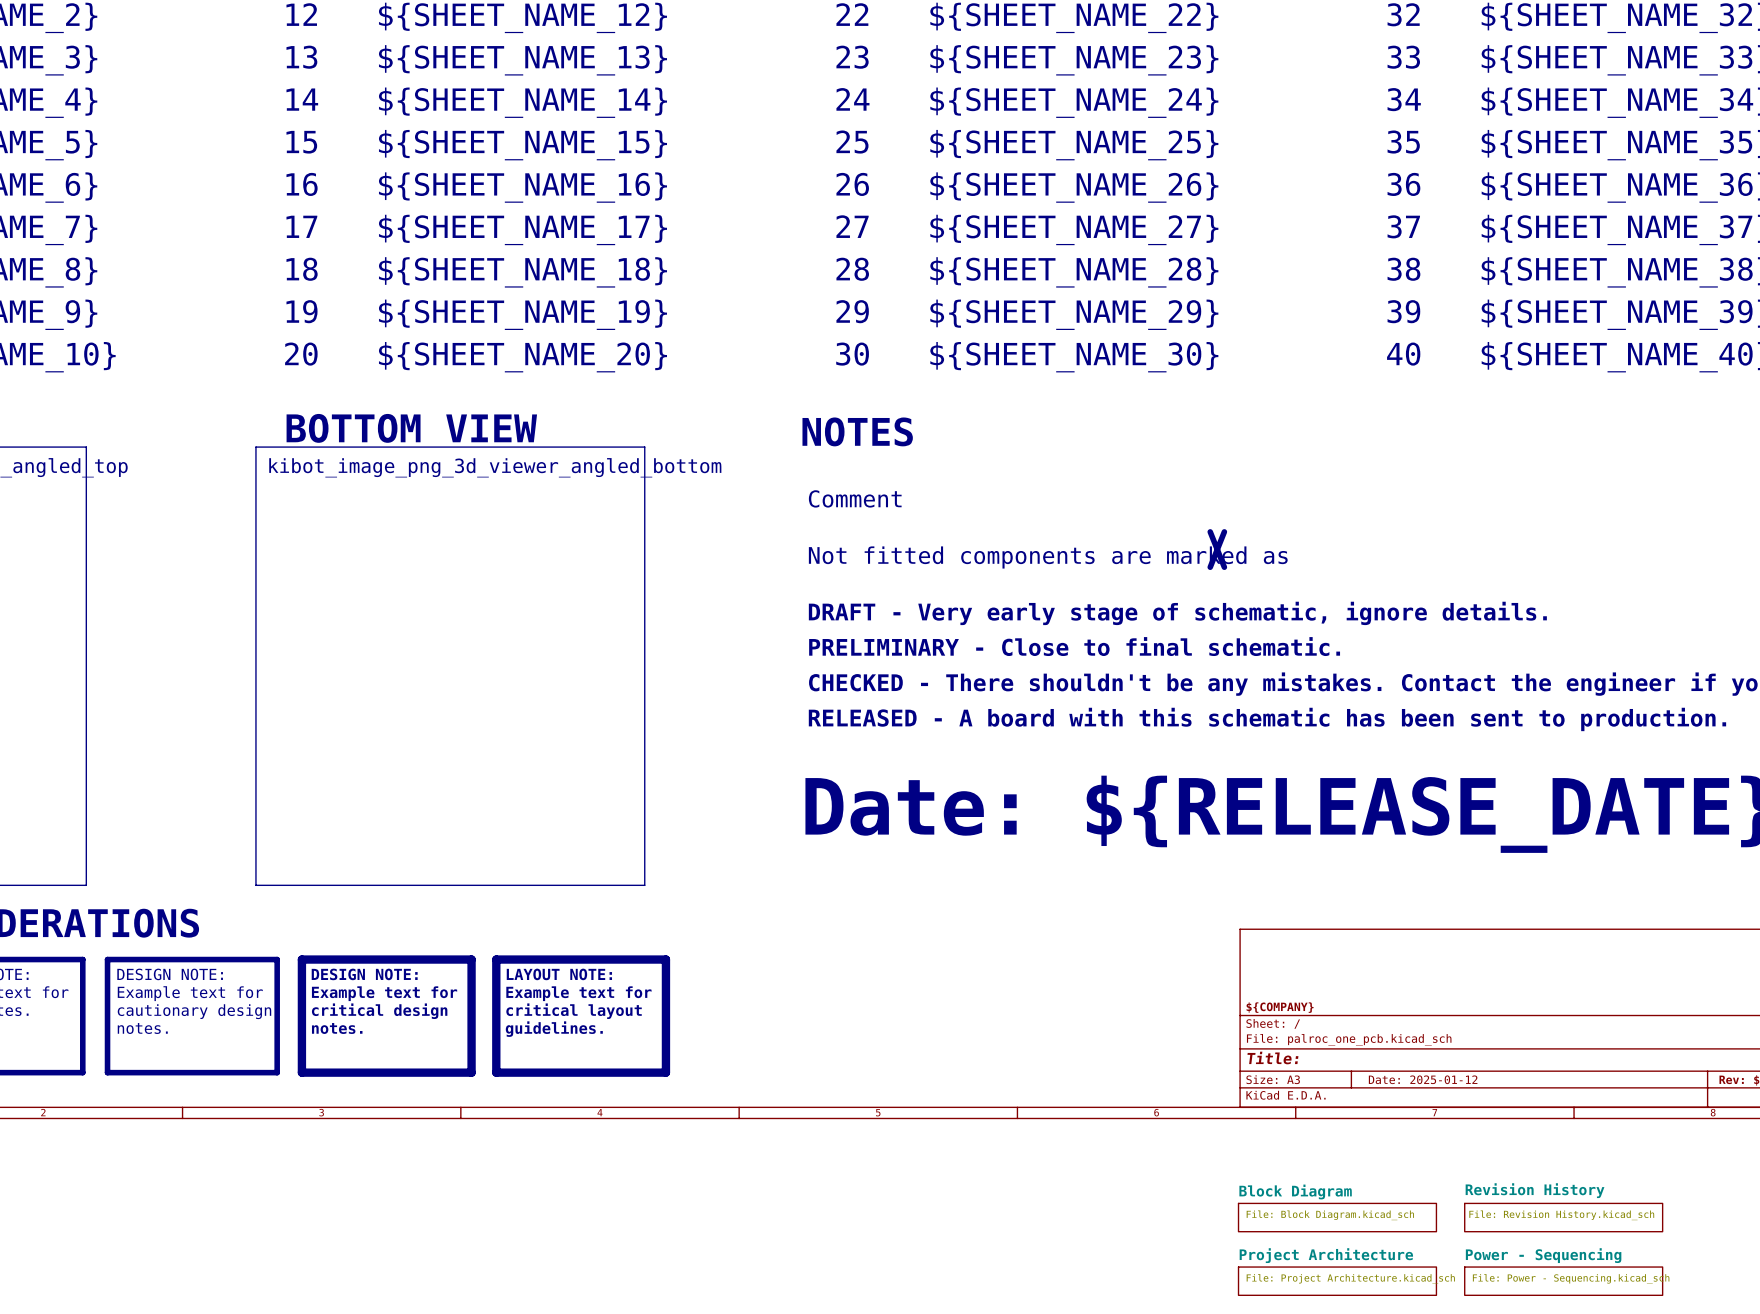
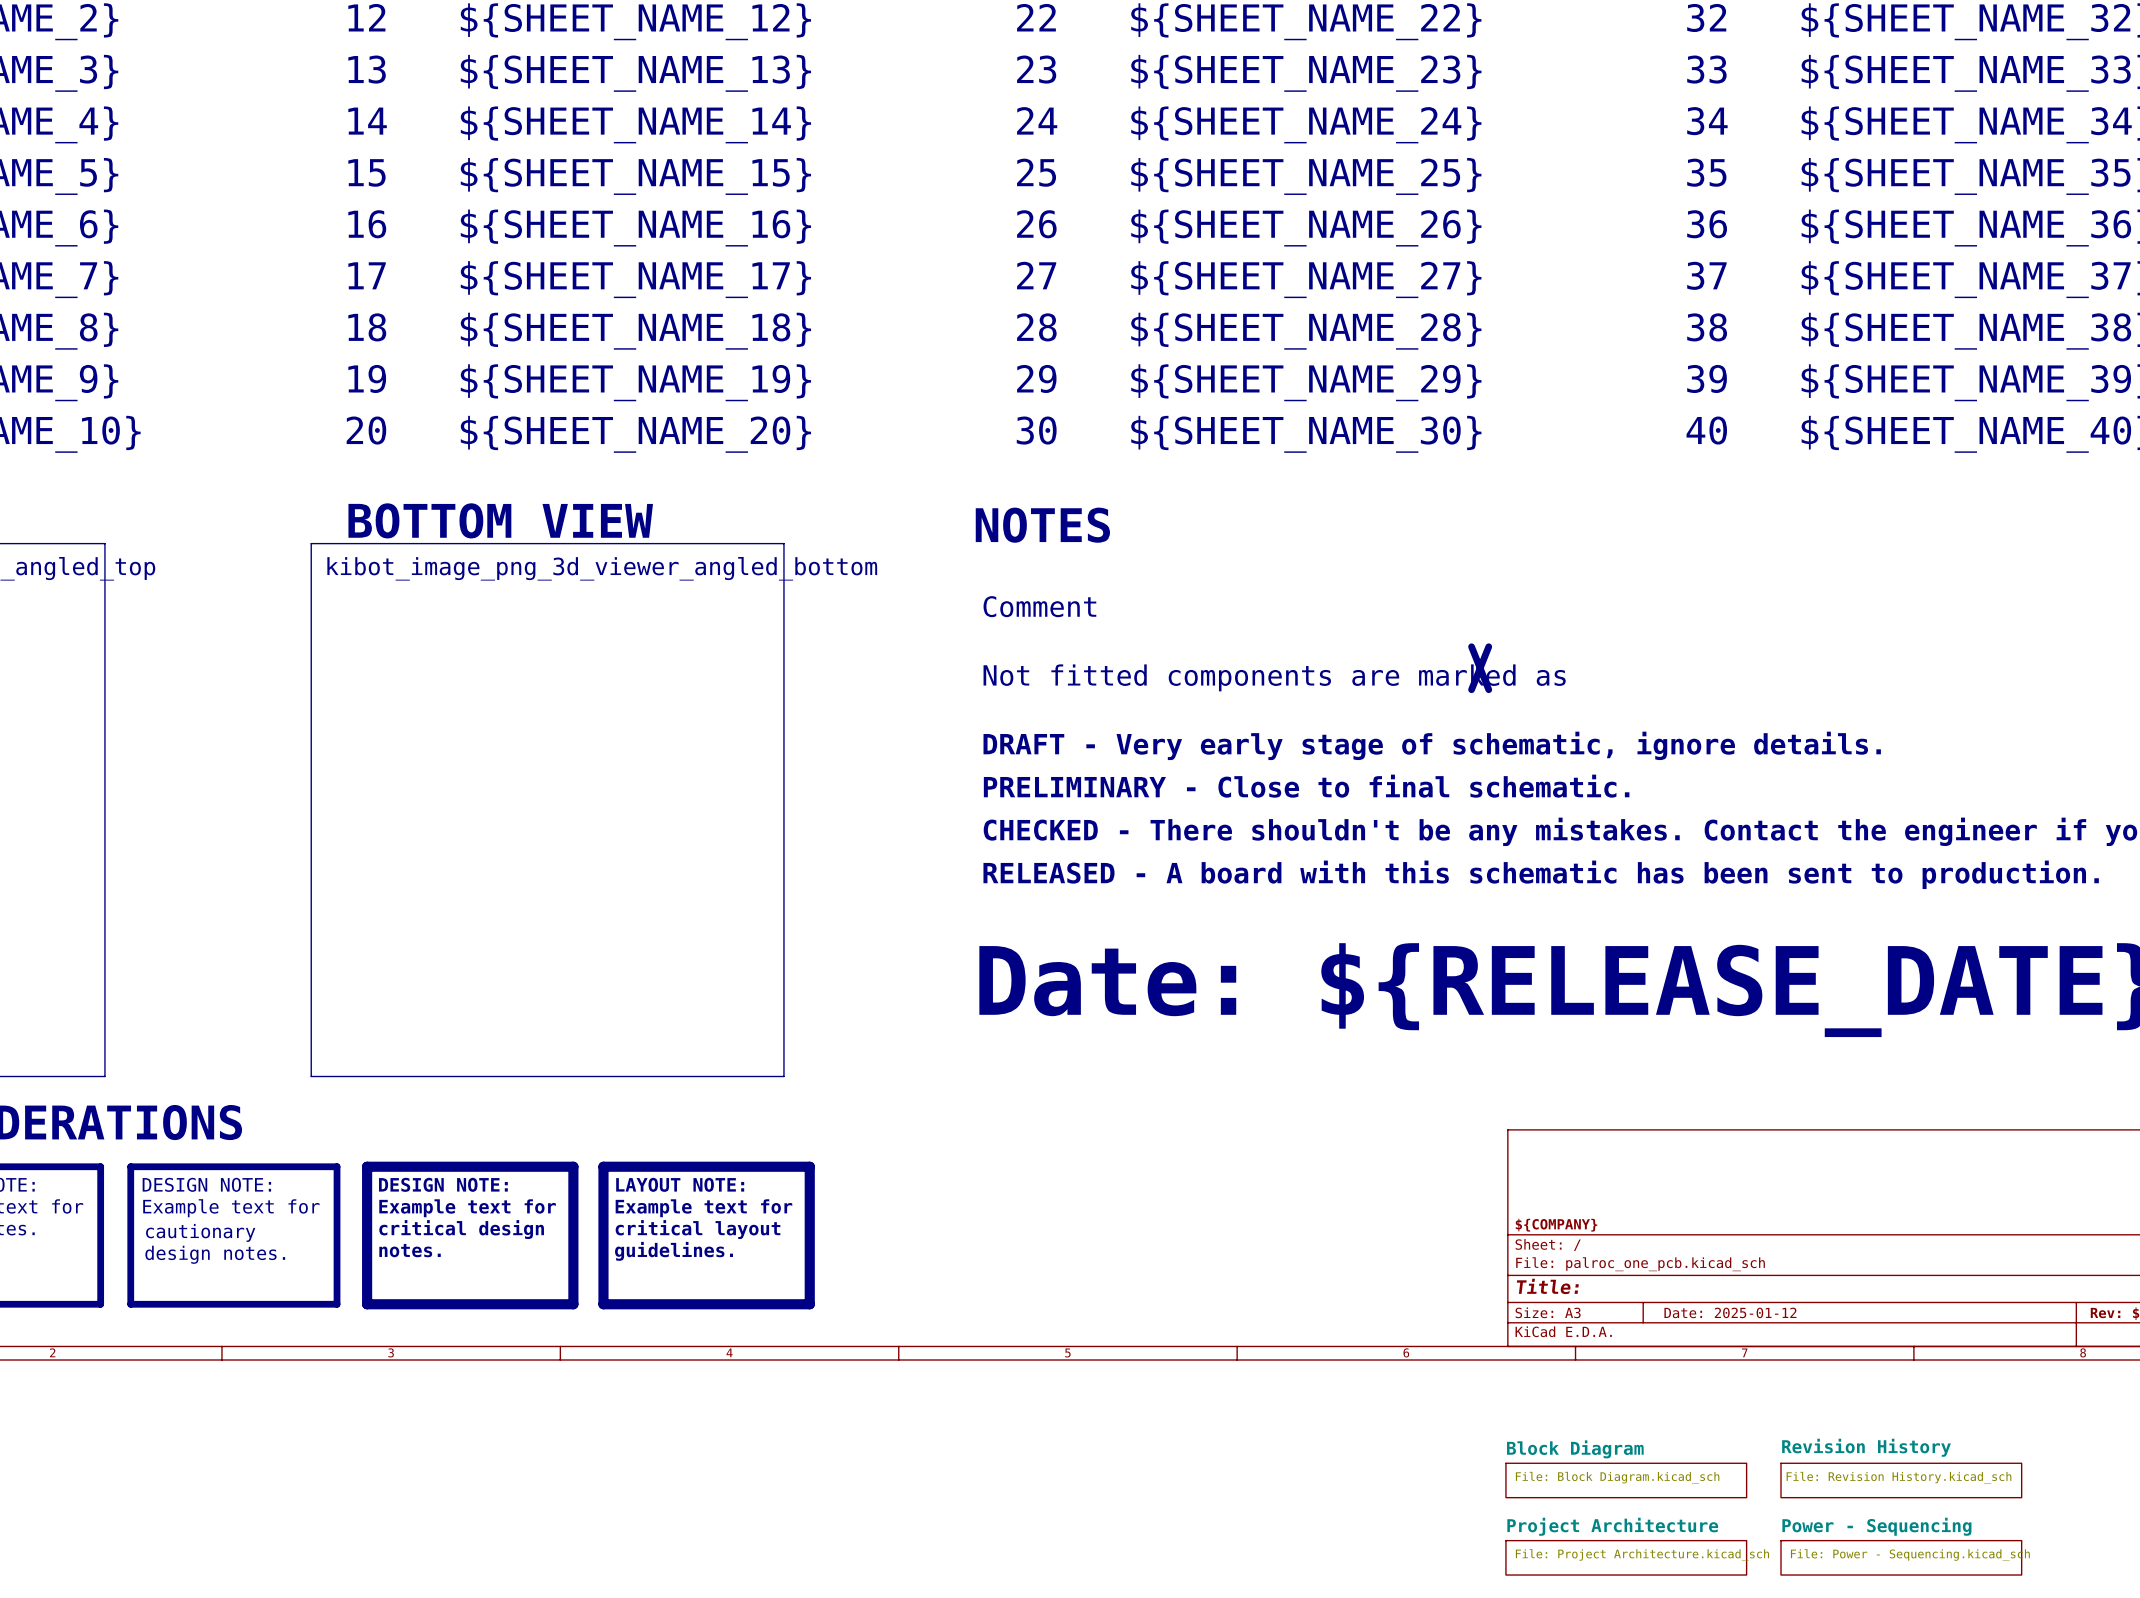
text: cautionary design (194, 1011) -> cautionary (200, 1232)
text: notes. (142, 1028) -> design notes. (215, 1254)

